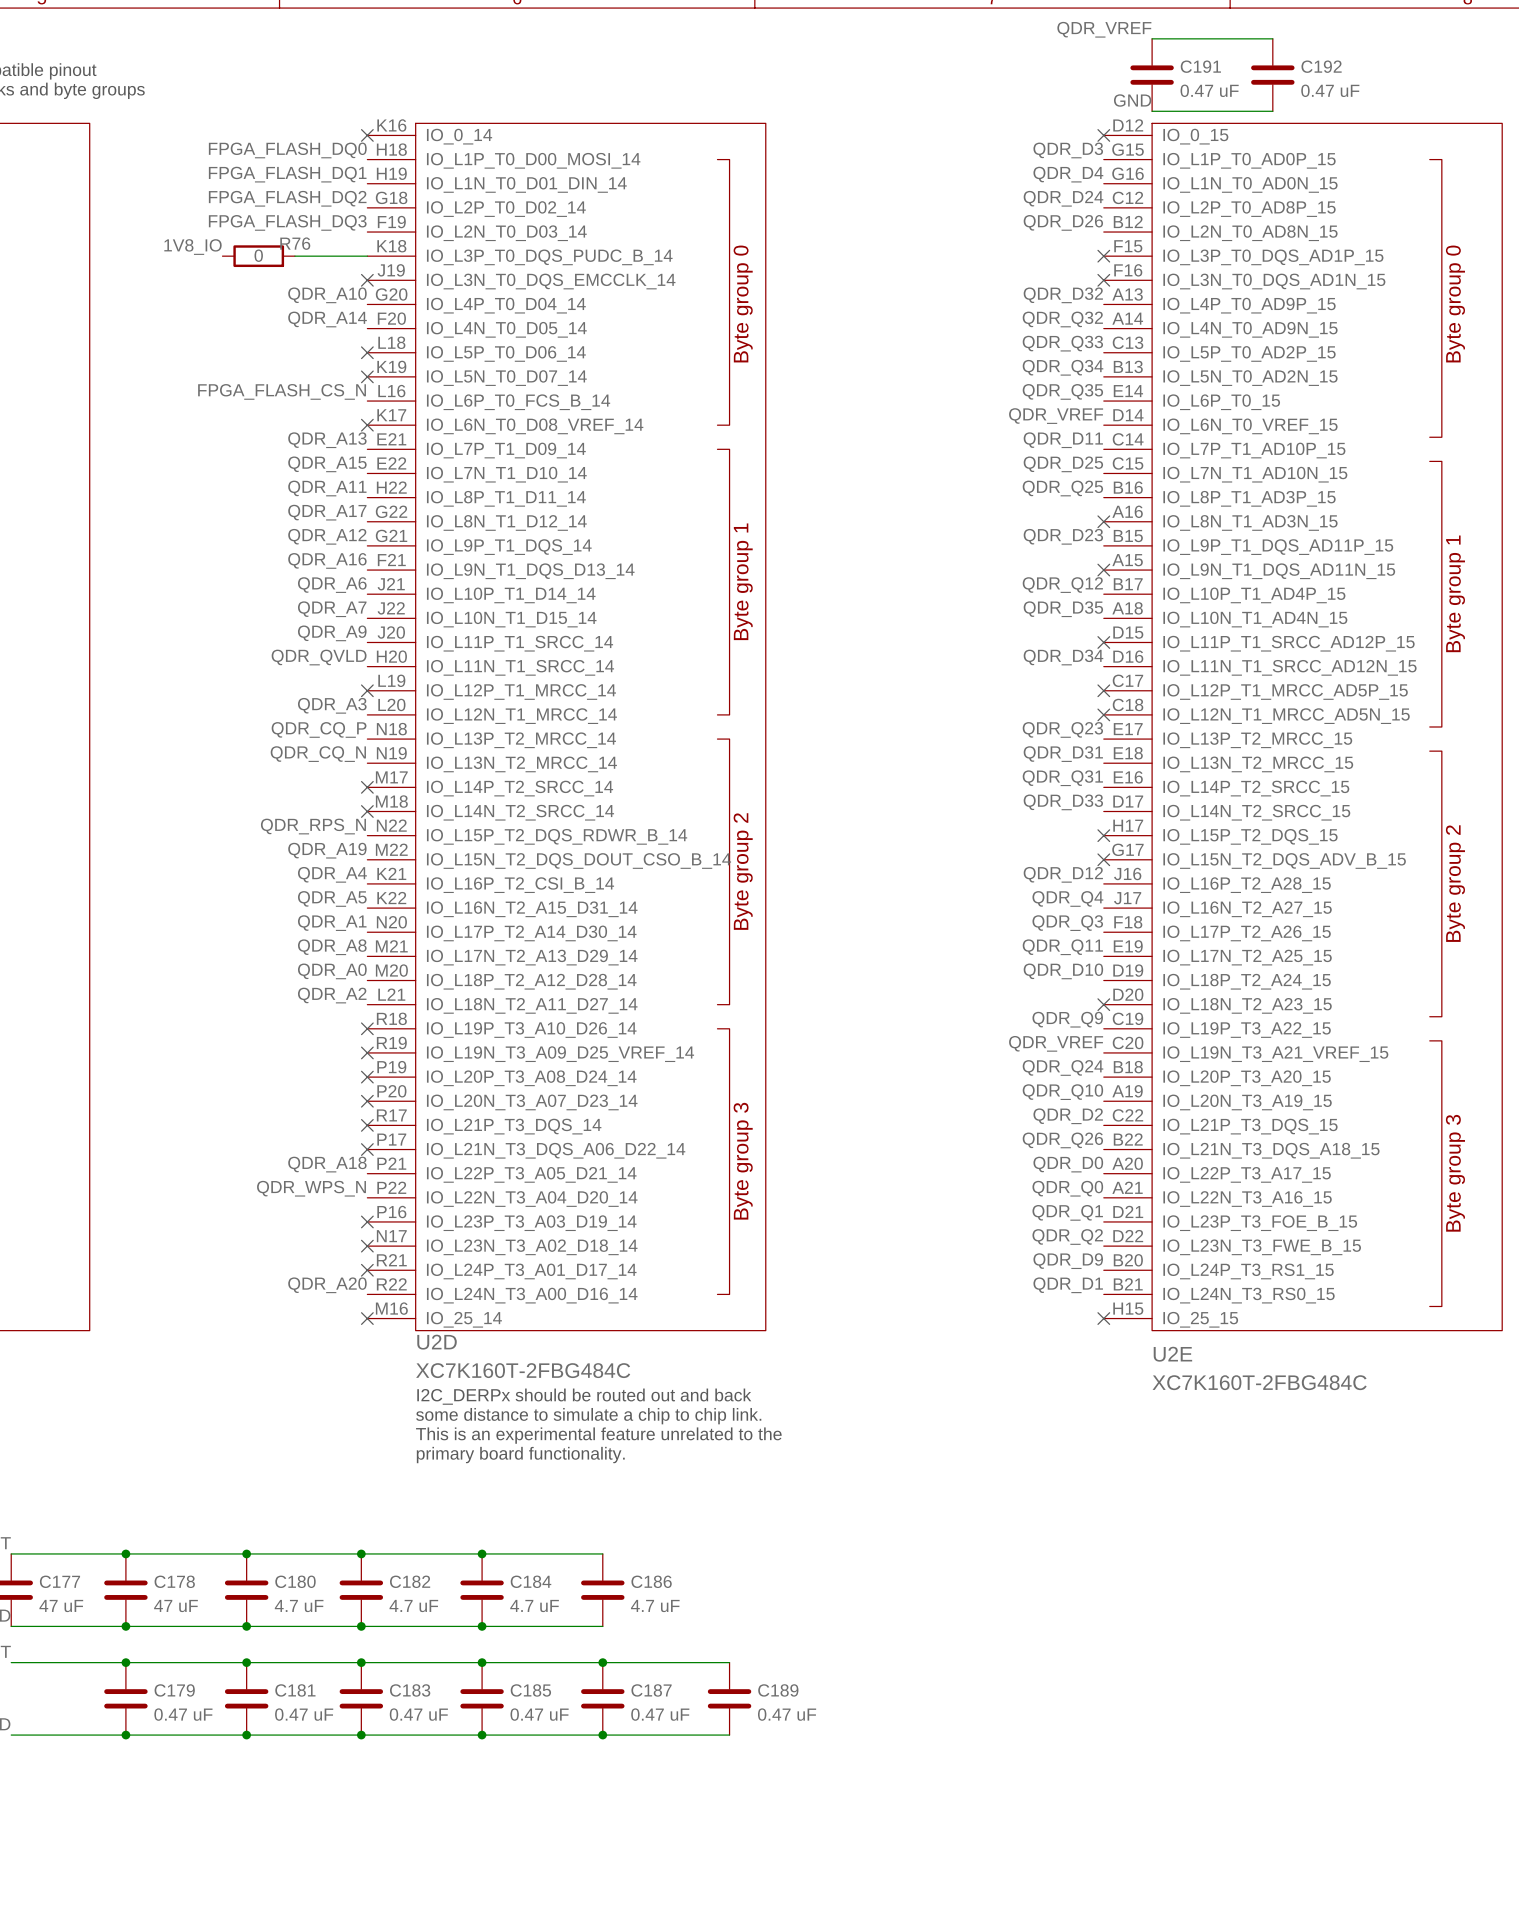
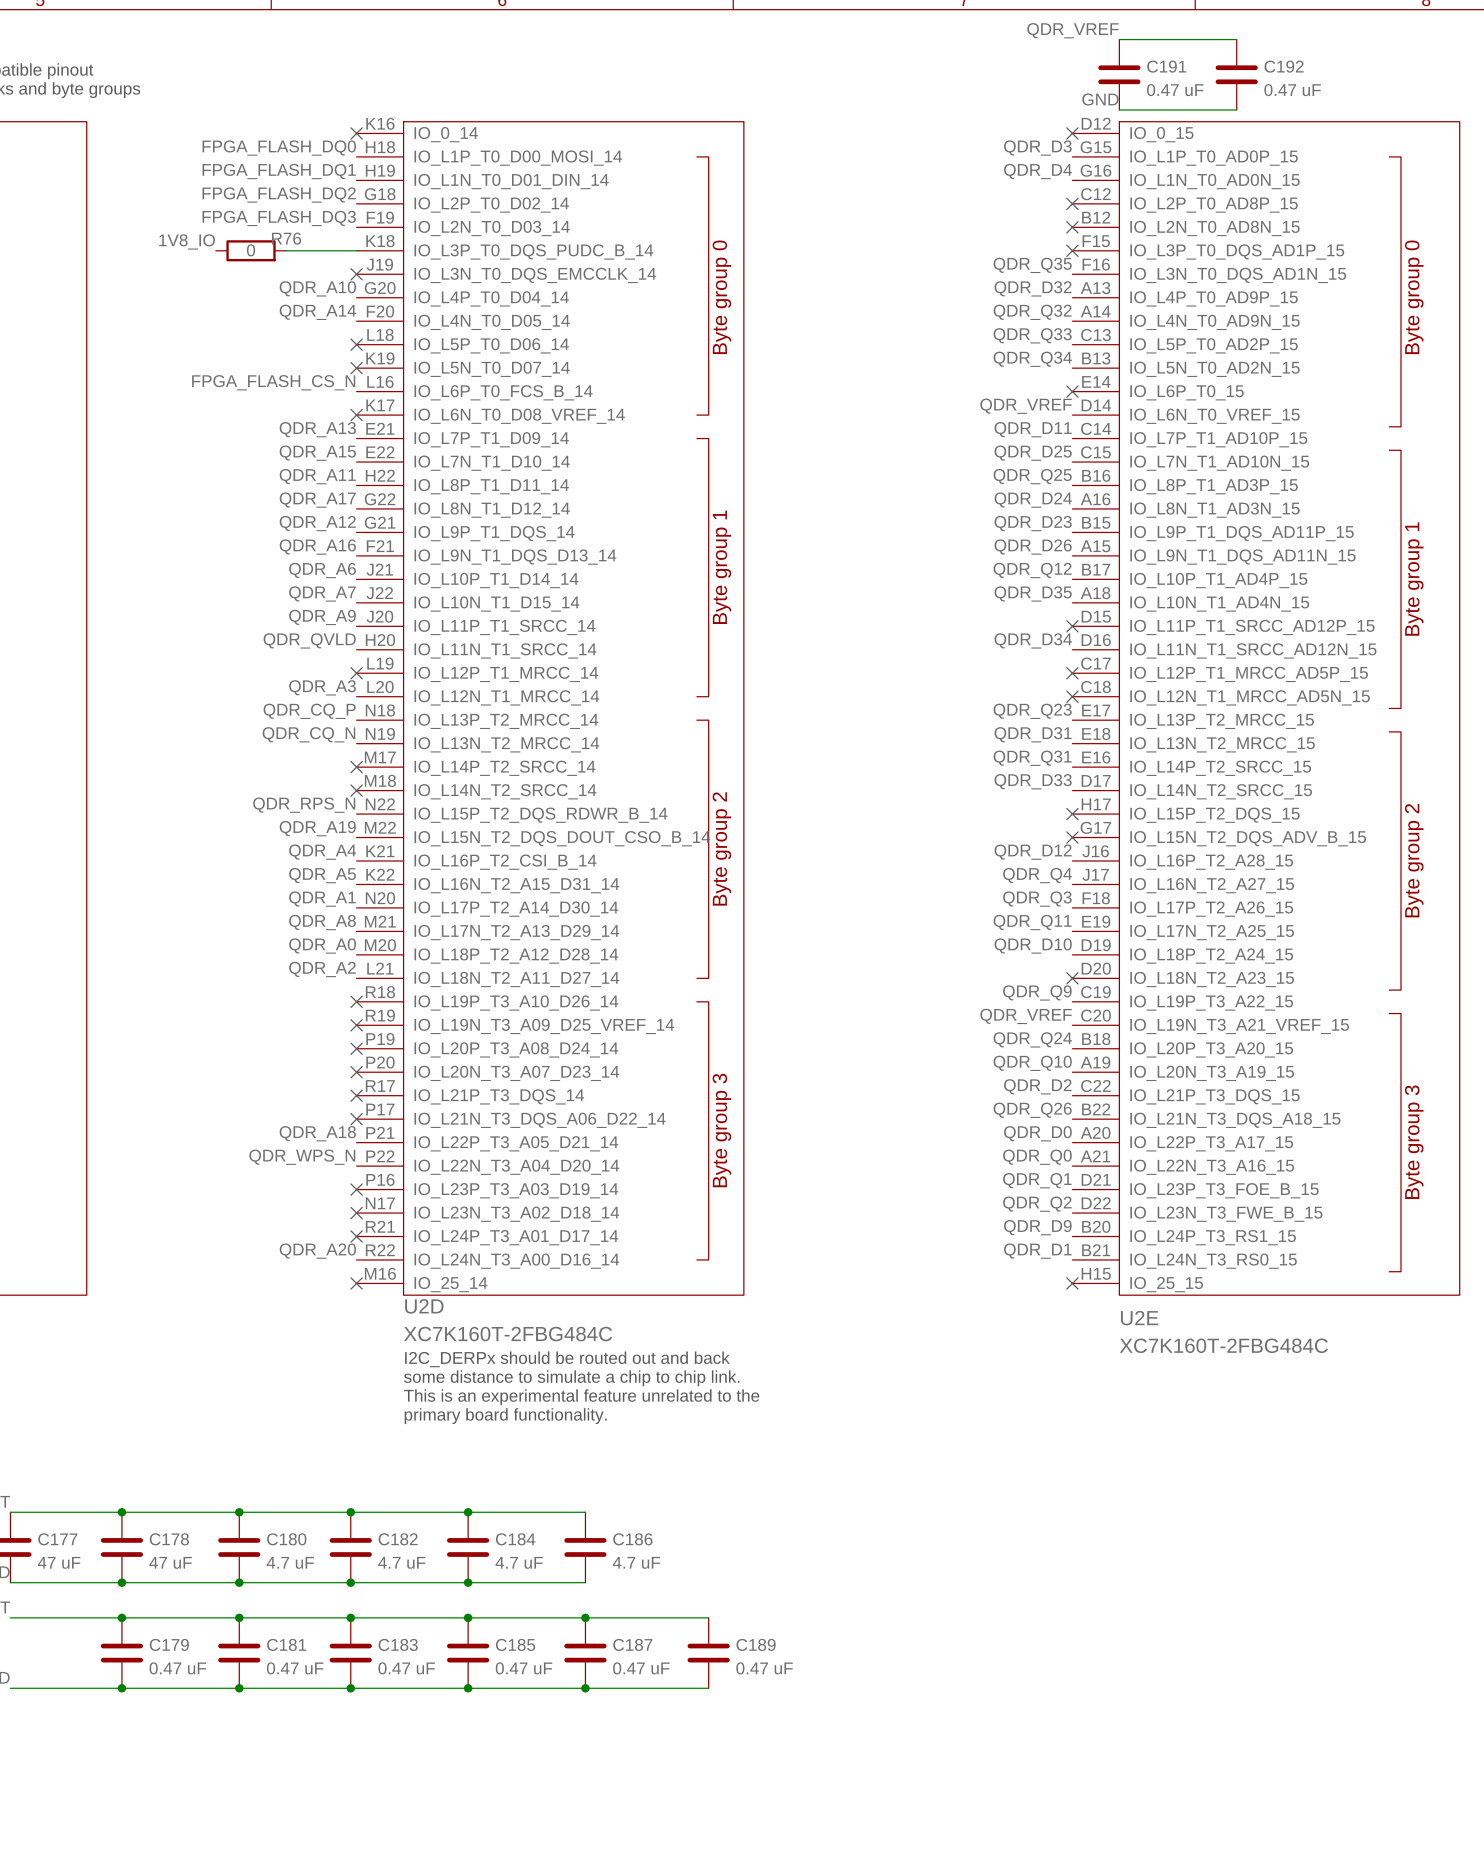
label: QDR_D24 (1063, 198) -> none
no-connect mark: none -> (1072, 203)
label: QDR_D26 (1063, 222) -> none
no-connect mark: none -> (1072, 227)
no-connect mark: (1103, 280) -> none
label position: QDR_Q35 (1062, 391) -> QDR_Q35 (1032, 265)
no-connect mark: none -> (1072, 391)
label: none -> QDR_D24 (1033, 500)
no-connect mark: (1103, 521) -> none
label: none -> QDR_D26 (1033, 547)
no-connect mark: (1103, 570) -> none

